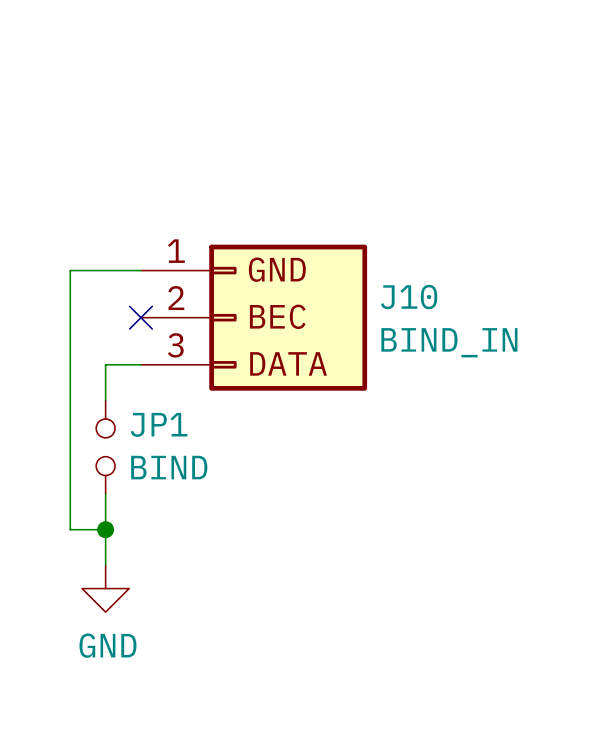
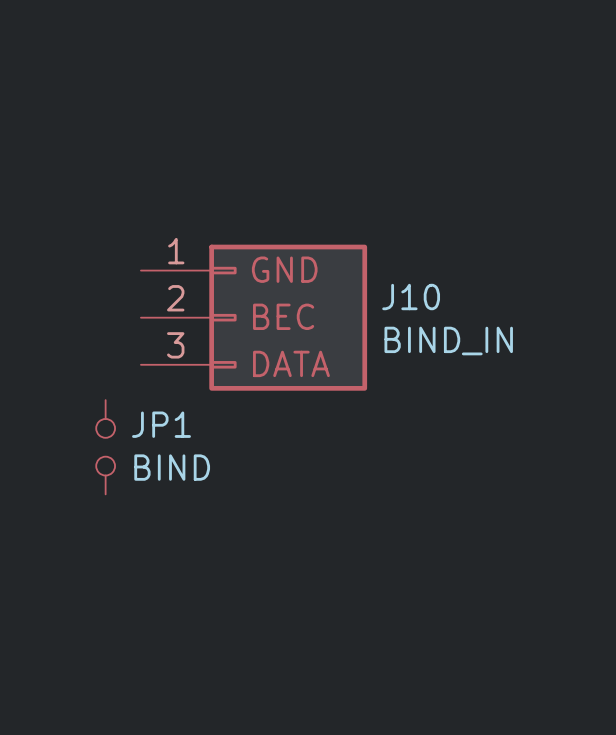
wire: (140, 270) (70, 270) (70, 529) (105, 529) -> none
no-connect mark: (140, 317) -> none
wire: (140, 364) (105, 364) (105, 400) -> none
wire: (105, 494) (105, 565) -> none
junction: (105, 529) -> none
power symbol: GND (105, 588) -> none

